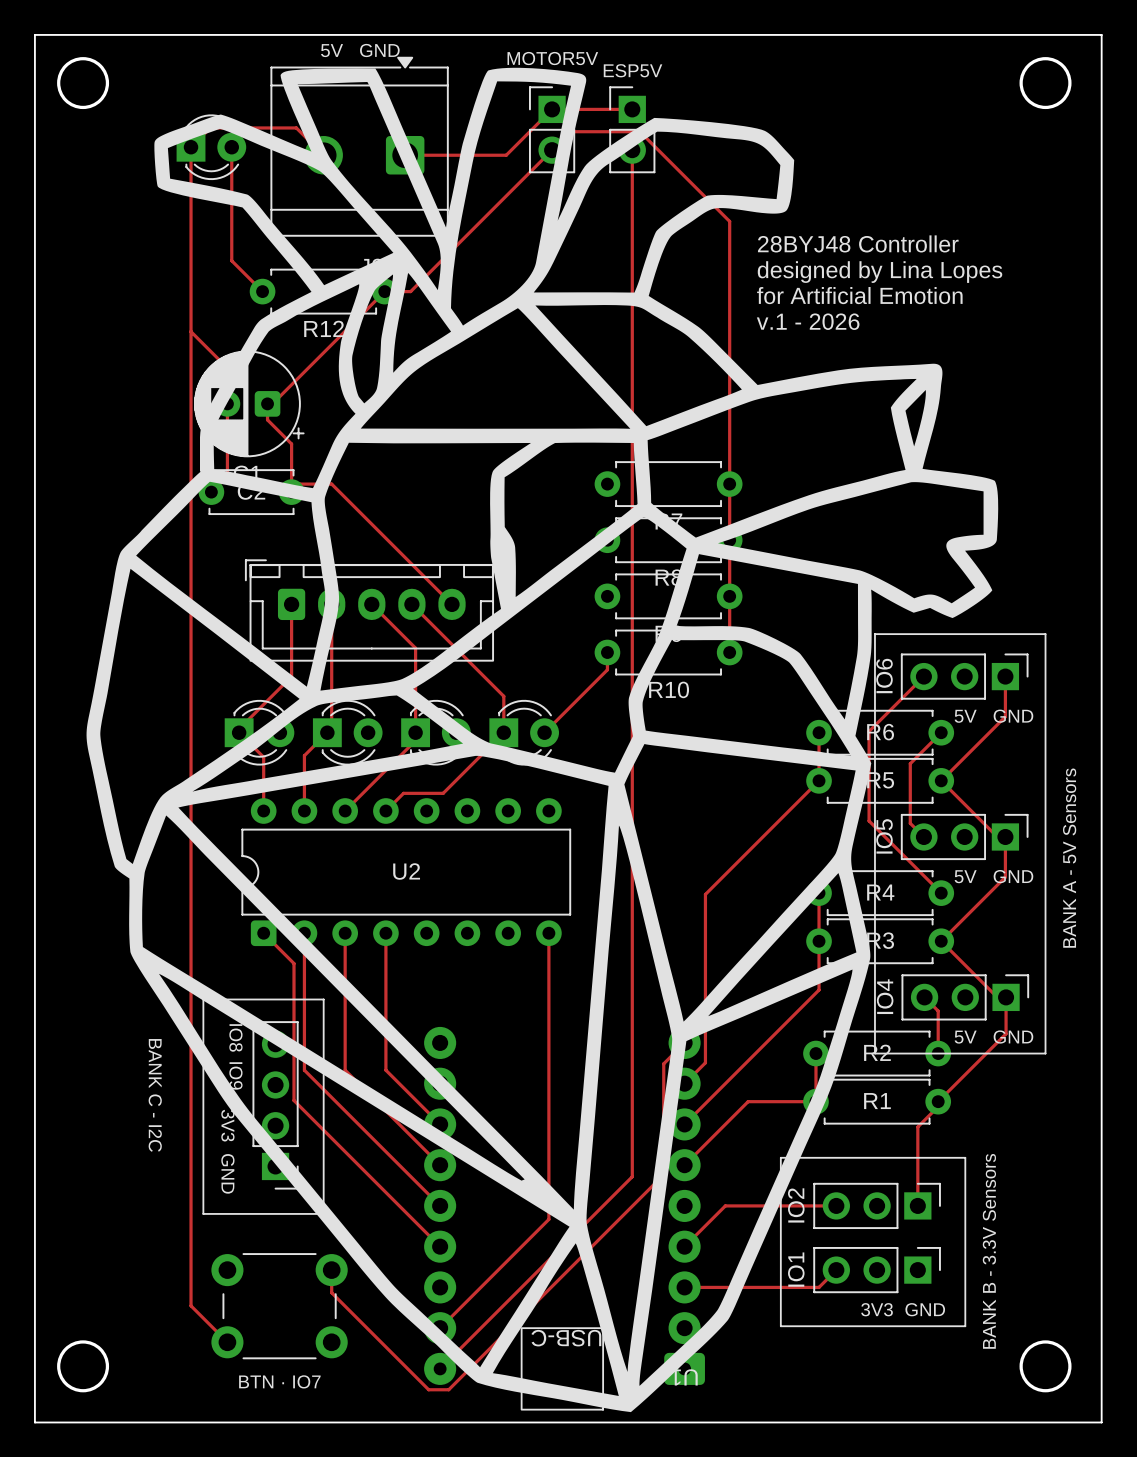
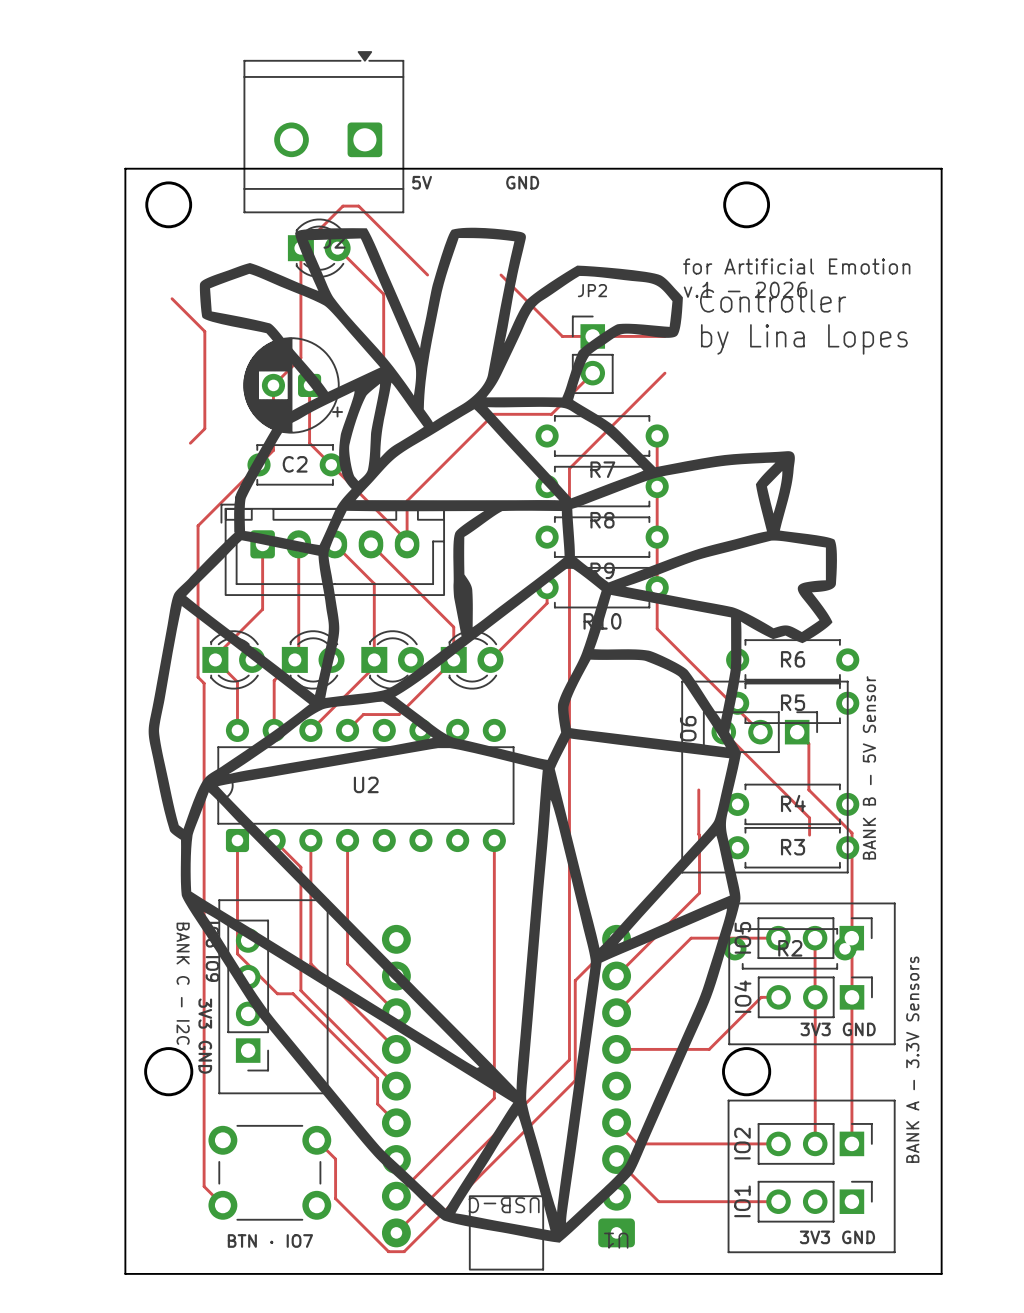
board edge: (34, 34) (1101, 34) (1101, 1422) (34, 1422) (34, 34) -> (125, 168) (125, 1273) (941, 1273) (941, 168) (125, 168)
text position: 5V (332, 50) -> 5V (422, 182)
text position: GND (379, 50) -> GND (522, 182)
drawing: [86, 67, 999, 1413] -> none
round board edge position: (83, 83) -> (168, 204)
round board edge position: (1045, 83) -> (746, 204)
track: (632, 109) (552, 109) (506, 155) (405, 155) -> none
MOTOR5V: (552, 129) -> none
ESP5V: (632, 129) -> none
part position: (211, 147) -> (319, 248)
track: (231, 147) (231, 260) (262, 291) -> none
track: (632, 150) (632, 520) -> (664, 373) (569, 468)
track: (323, 155) (296, 127) (210, 127) (191, 147) (191, 1305) (227, 1342) -> none
text: 28BYJ48 Controller (858, 243) -> none
drawing: none -> [148, 227, 837, 1243]
text: designed by Lina Lopes (880, 272) -> none
track: none -> (337, 248) (383, 294) (383, 414)
R12: (323, 291) -> none
track: none -> (427, 275) (358, 206) (342, 206) (300, 248) (300, 357) (273, 385) (273, 450) (198, 525) (198, 677) (204, 683) (204, 1186) (222, 1205)
track: none -> (501, 275) (562, 336) (664, 336)
text: none -> Controller (773, 300)
text: none -> by Lina Lopes (804, 339)
JP2: none -> (592, 354)
part: (249, 403) -> none
part: none -> (293, 385)
track: none -> (309, 385) (309, 443) (407, 540)
track: (729, 484) (729, 221) (639, 131) (570, 131) (410, 291) (384, 291) (272, 403) (267, 403) (267, 419) (291, 443) (291, 492) (299, 484) (331, 484) (452, 604) -> (592, 373) (551, 414) (493, 414) (407, 501) (407, 544)
C2 position: (251, 492) -> (295, 464)
line: (874, 634) (1045, 634) (1045, 1053) (874, 1053) (874, 634) -> none
track: none -> (657, 587) (657, 628) (760, 732)
track: (923, 676) (869, 731) (869, 820) (941, 893) -> none
IO6 position: (964, 676) -> (760, 732)
track: (1005, 676) (1005, 716) (941, 780) (997, 836) (1005, 836) (1005, 877) (941, 941) (997, 997) (1006, 997) (1006, 1033) (938, 1101) (938, 1106) (917, 1127) (917, 1205) -> none
text: 5V (965, 716) -> none
text: GND (1013, 716) -> none
track: (819, 732) (819, 780) (705, 894) (705, 1062) -> (698, 789) (699, 893) (635, 957)
track: (941, 732) (910, 763) (910, 823) (923, 836) -> none
line: none -> (682, 681) (847, 681) (847, 872) (682, 872) (682, 681)
track: none -> (723, 732) (809, 817) (809, 835)
track: none -> (797, 732) (808, 743) (808, 789) (852, 833) (852, 997)
IO5 position: (964, 836) -> (815, 938)
text: BANK A - 5V Sensors (1069, 858) -> none
text: none -> BANK B - 5V Sensor (869, 767)
text: 5V (965, 876) -> none
text: GND (1013, 876) -> none
track: (819, 893) (819, 990) (767, 1041) -> (778, 938) (691, 938)
track: (263, 933) (294, 963) (294, 1100) (419, 1225) -> (237, 840) (237, 953) (277, 993) (293, 993) (377, 1078) (377, 1104)
track: (304, 933) (304, 1070) (334, 1099) -> (274, 840) (300, 867) (300, 990)
track: (924, 997) (938, 1011) (938, 1053) -> none
IO4 position: (965, 997) -> (815, 997)
line: (243, 999) (203, 999) (203, 1213) (243, 1213) -> (219, 900) (219, 1093)
line: (323, 999) (323, 1213) -> (291, 900) (327, 900) (327, 1093) (291, 1093)
line: none -> (729, 903) (894, 903) (894, 1044) (729, 1044) (729, 903)
text: 5V (965, 1037) -> none
text: GND (1013, 1037) -> none
track: none -> (815, 938) (815, 997)
track: (815, 1053) (815, 1101) (748, 1101) (684, 1165) -> (778, 997) (761, 997) (709, 1049) (616, 1049)
track: (663, 1063) (663, 1174) (638, 1199) -> (597, 958) (575, 980) (575, 1080)
text position: BANK C - I2C (155, 1095) -> BANK C - I2C (183, 983)
R1: (877, 1101) -> none
track: none -> (815, 997) (815, 1143)
track: none -> (851, 997) (851, 1143)
text: none -> 3V3 (815, 1029)
text: none -> GND (859, 1029)
line: (780, 1157) (965, 1157) (965, 1326) (780, 1326) (780, 1157) -> (728, 1100) (894, 1100) (894, 1252) (728, 1252) (728, 1100)
round board edge: none -> [144, 1047, 194, 1097]
round board edge: none -> [722, 1047, 772, 1097]
drawing shape: [521, 1179, 534, 1189] -> [477, 1067, 487, 1074]
track: (836, 1205) (725, 1205) (684, 1246) -> (778, 1143) (637, 1143) (616, 1122)
IO2 position: (877, 1205) -> (815, 1143)
text: BANK B - 3.3V Sensors (989, 1251) -> BANK A - 3.3V Sensors (912, 1059)
track: (331, 1270) (331, 1292) (428, 1389) (431, 1389) -> (316, 1140) (335, 1159) (335, 1198) (388, 1251)
track: (836, 1270) (819, 1287) (684, 1287) -> (778, 1201) (658, 1201) (616, 1159)
IO1 position: (877, 1270) -> (815, 1201)
BTN · IO7 position: (279, 1306) -> (269, 1172)
text position: 3V3 (877, 1309) -> 3V3 (814, 1237)
text position: GND (925, 1309) -> GND (858, 1237)
round board edge: [57, 1340, 110, 1393] -> none
round board edge: [1019, 1340, 1072, 1393] -> none

